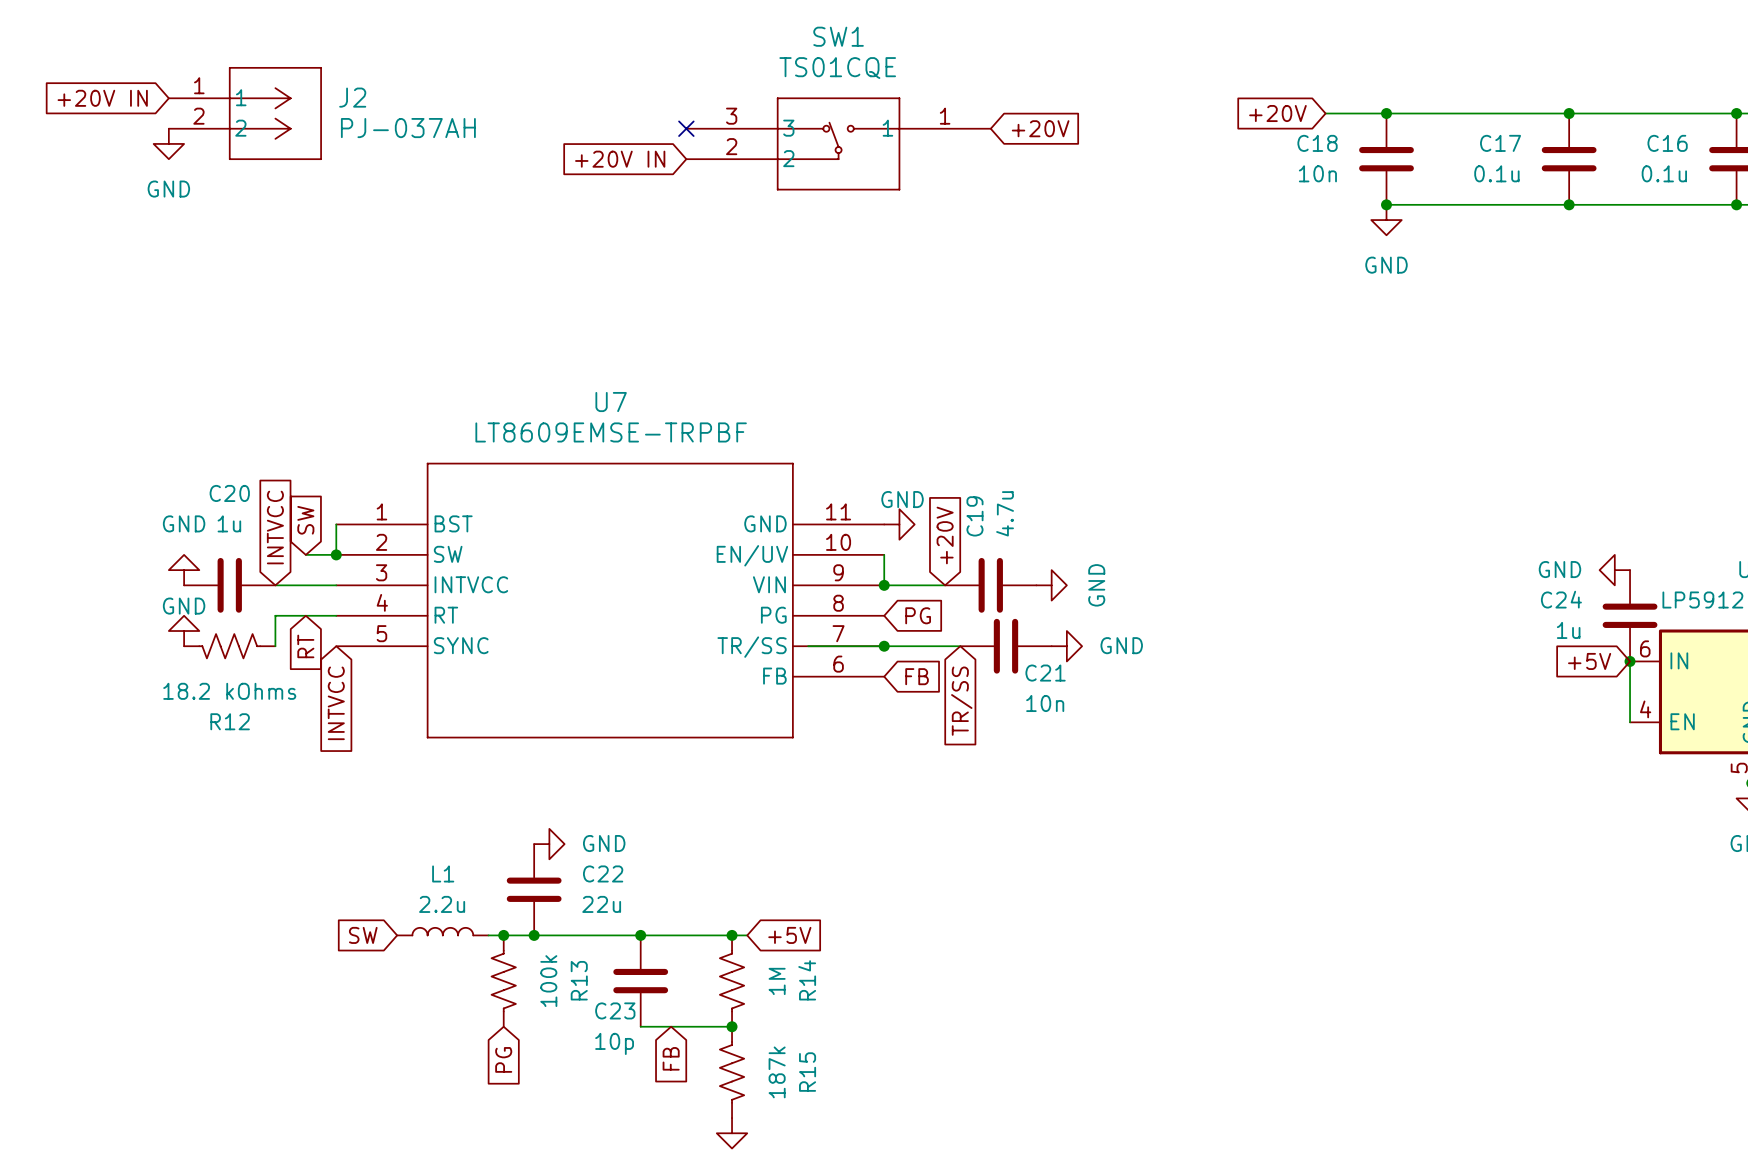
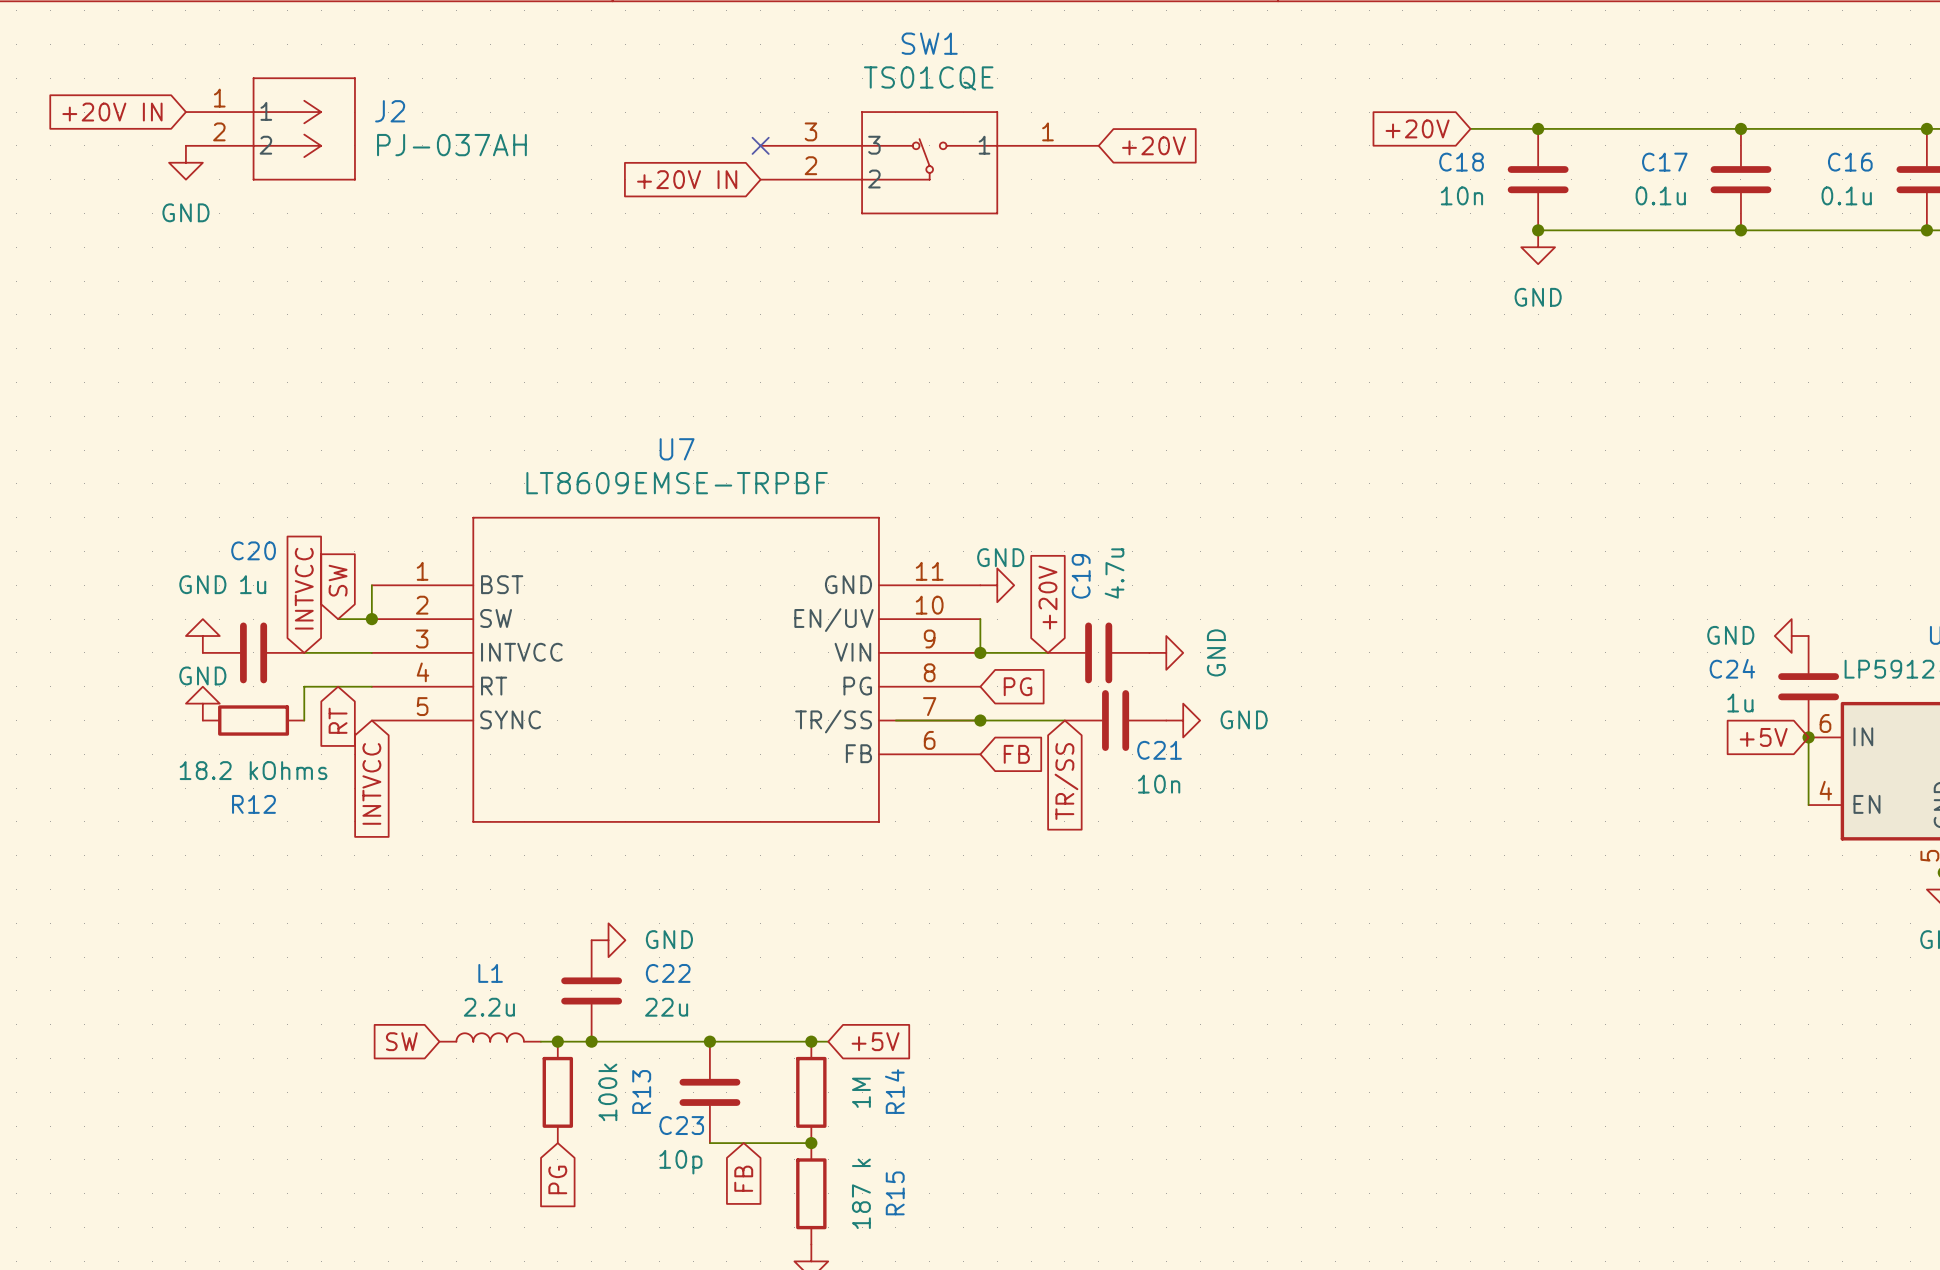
R12 symbol: [184, 634, 276, 659] -> [202, 705, 305, 736]
R13 symbol: [491, 935, 516, 1027] -> [542, 1041, 574, 1144]
R14 symbol: [719, 935, 745, 1027] -> [796, 1041, 827, 1144]
R15 symbol: [719, 1026, 745, 1119] -> [796, 1143, 827, 1245]
R15 value: 187k (777, 1072) -> 187 k (861, 1193)

